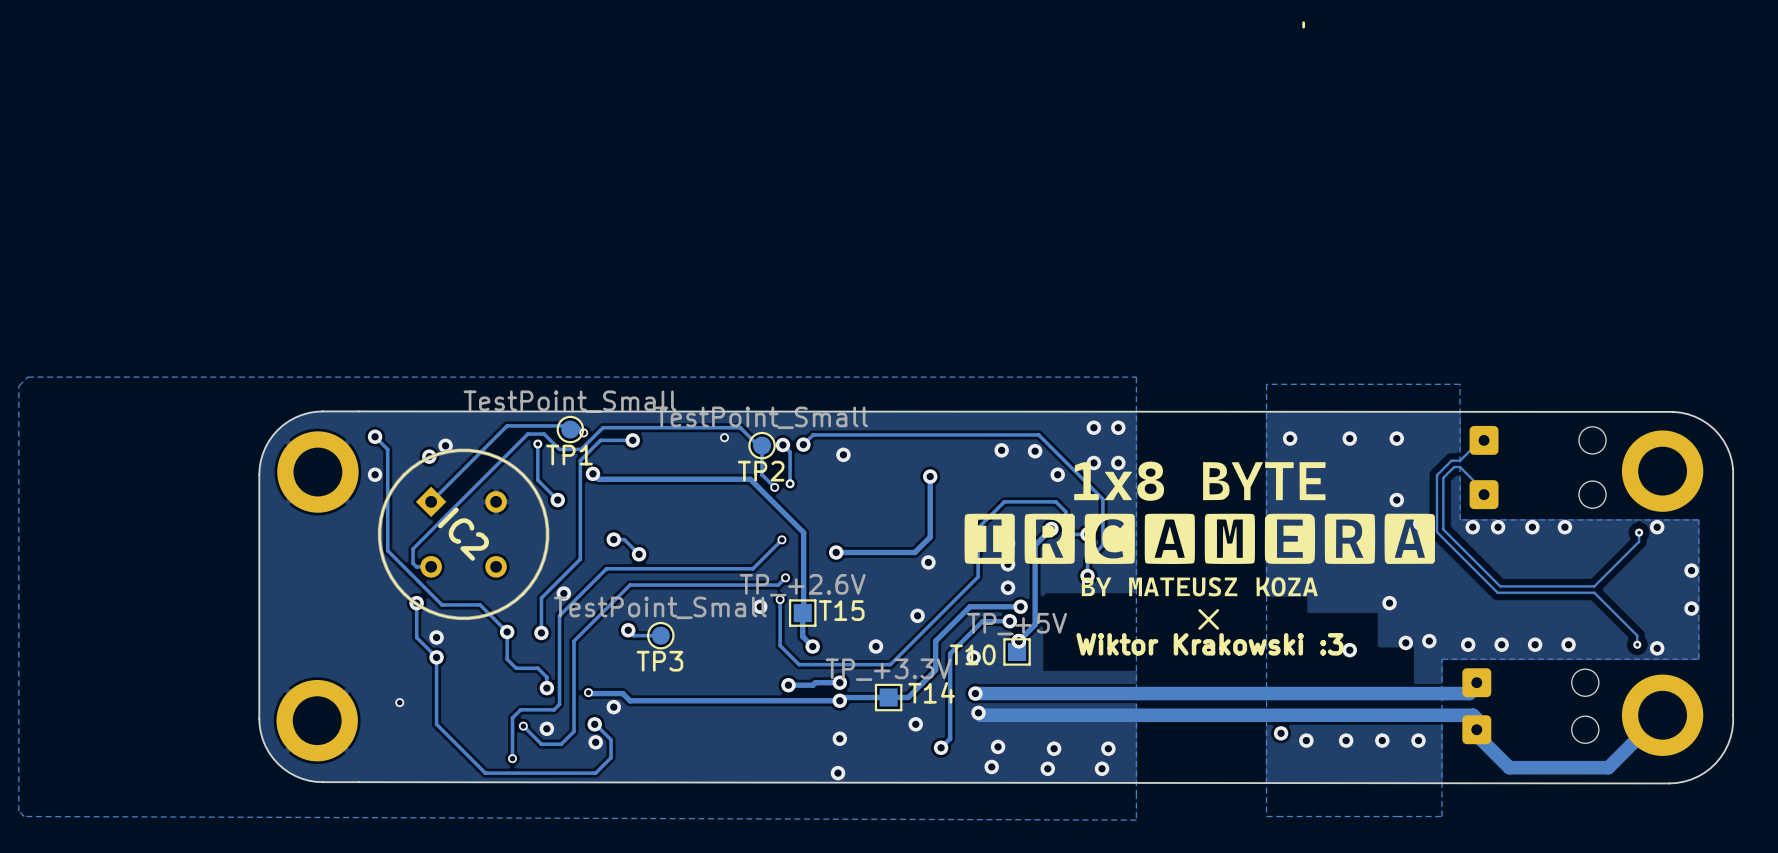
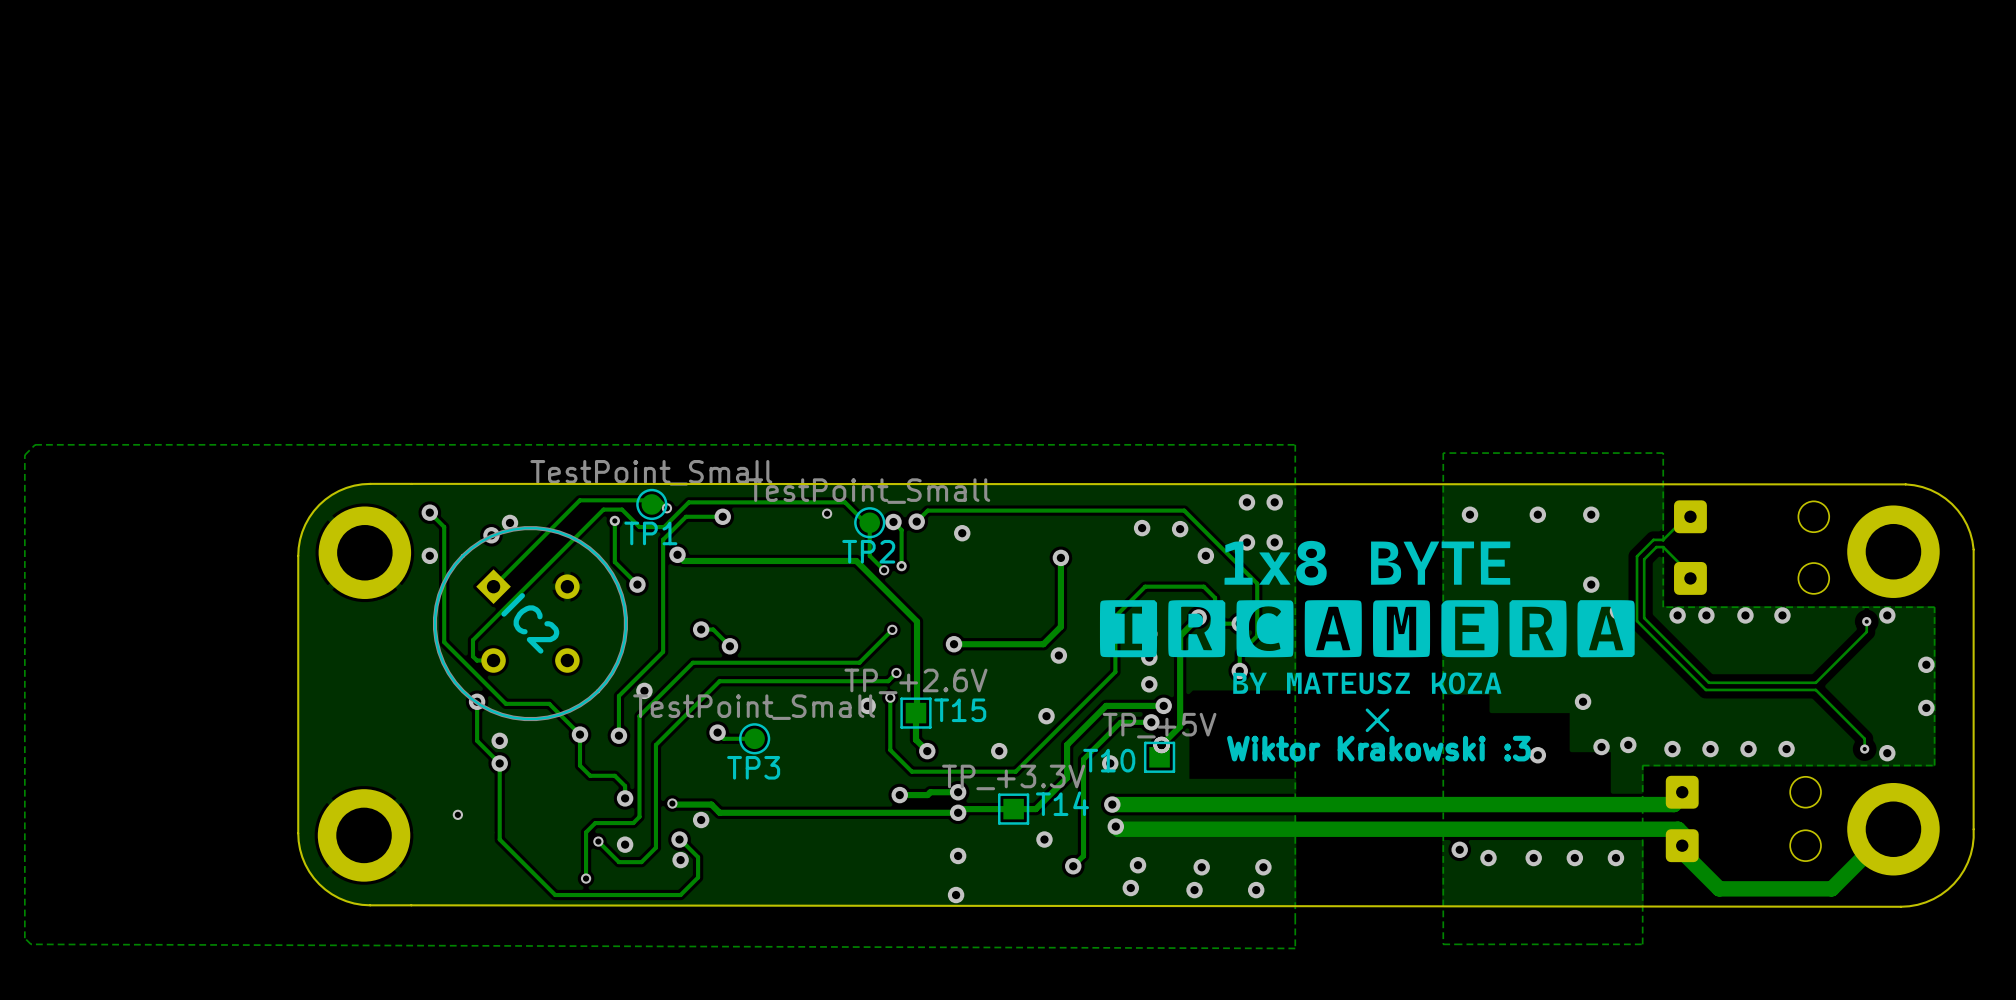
line: (1303, 22) (1303, 27) -> none

